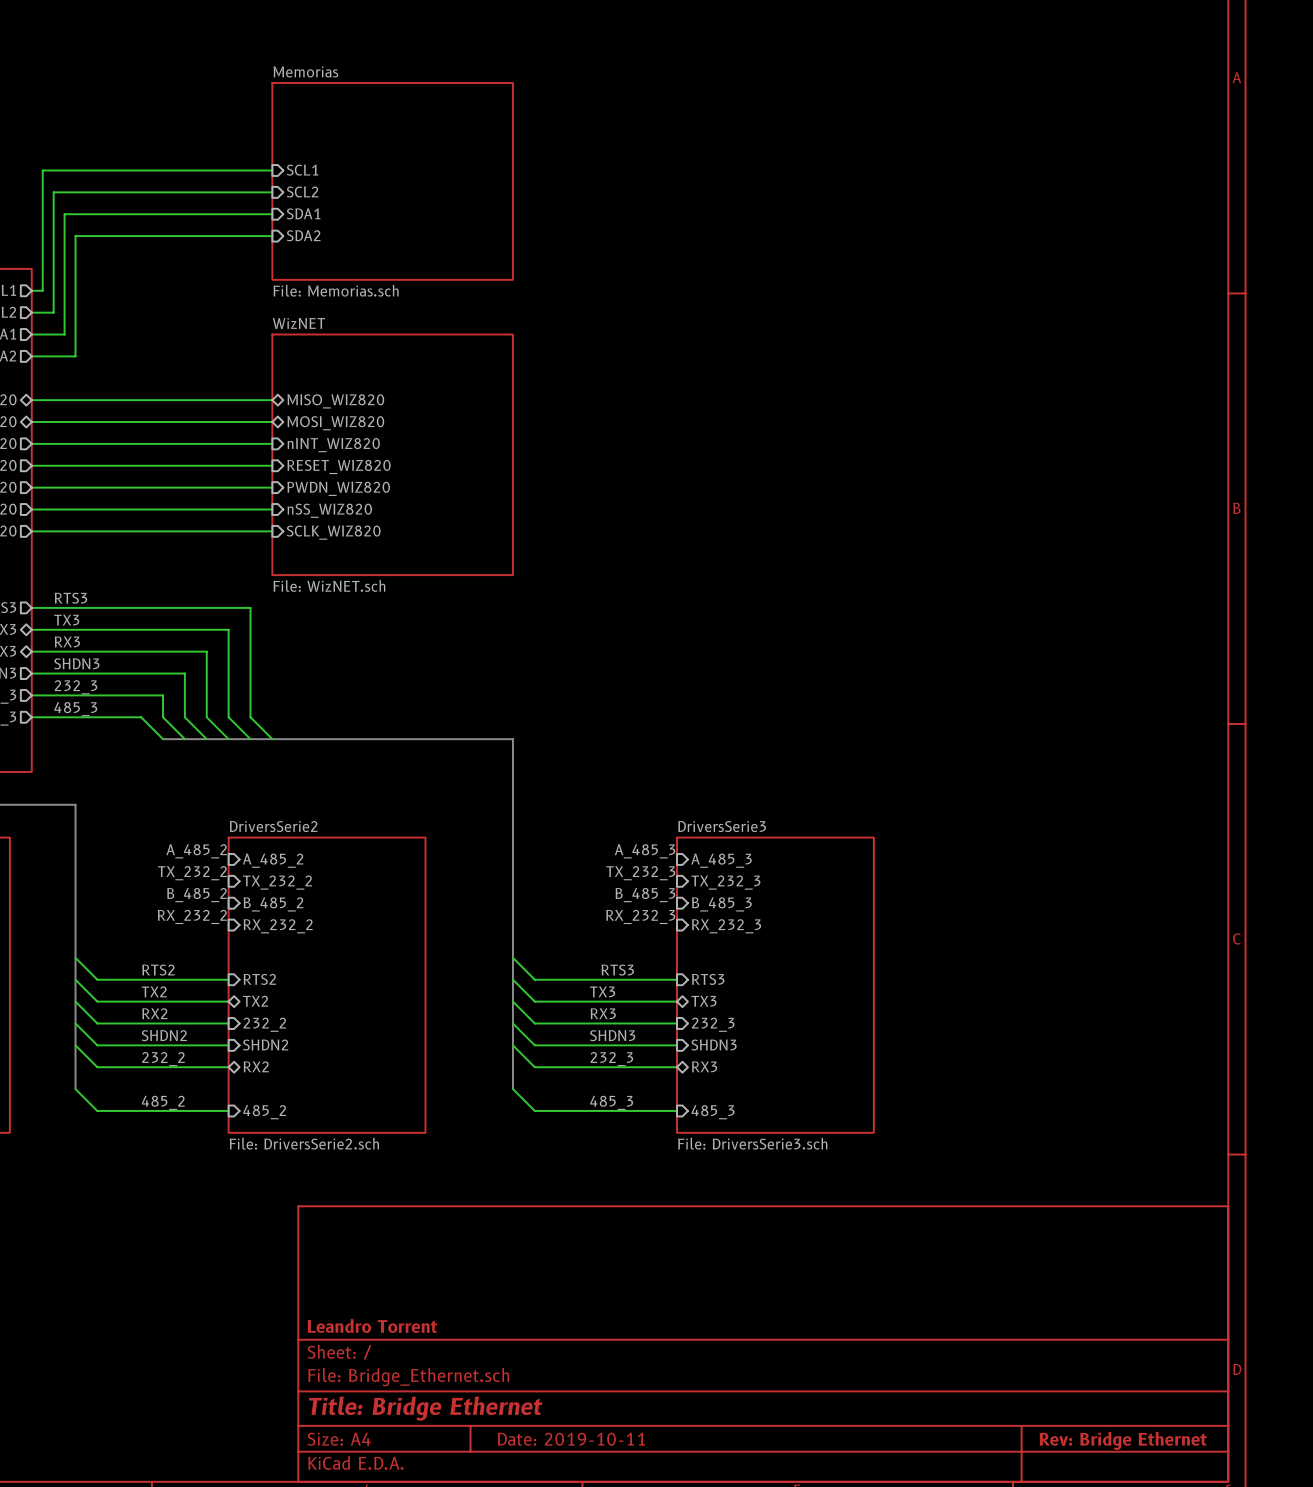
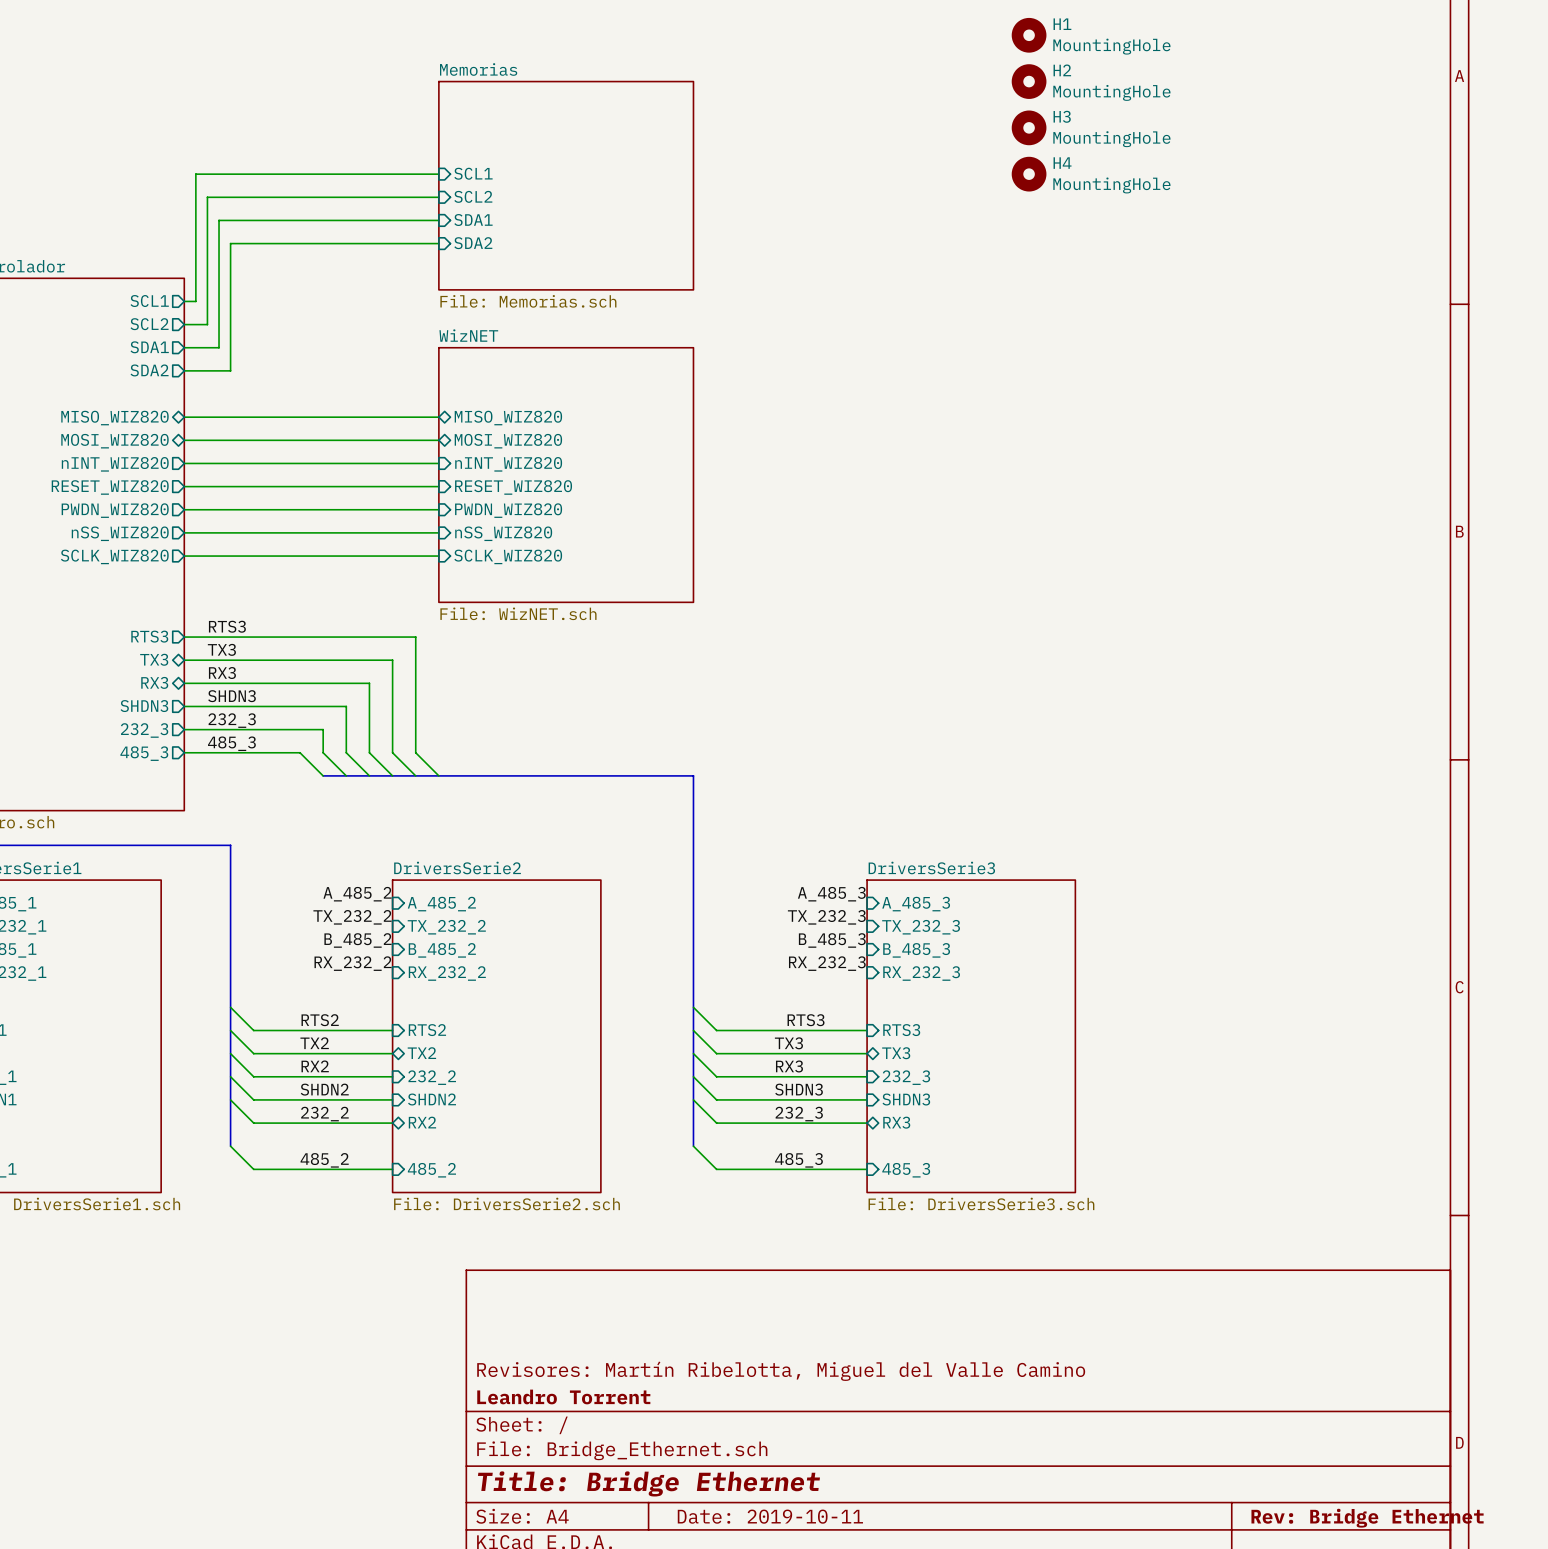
H1: none -> MountingHole (1029, 35)
H2: none -> MountingHole (1029, 81)
H3: none -> MountingHole (1029, 127)
H4: none -> MountingHole (1029, 174)
title block: none -> Revisores: Martín Ribelotta, Miguel del Valle Camino (781, 1371)

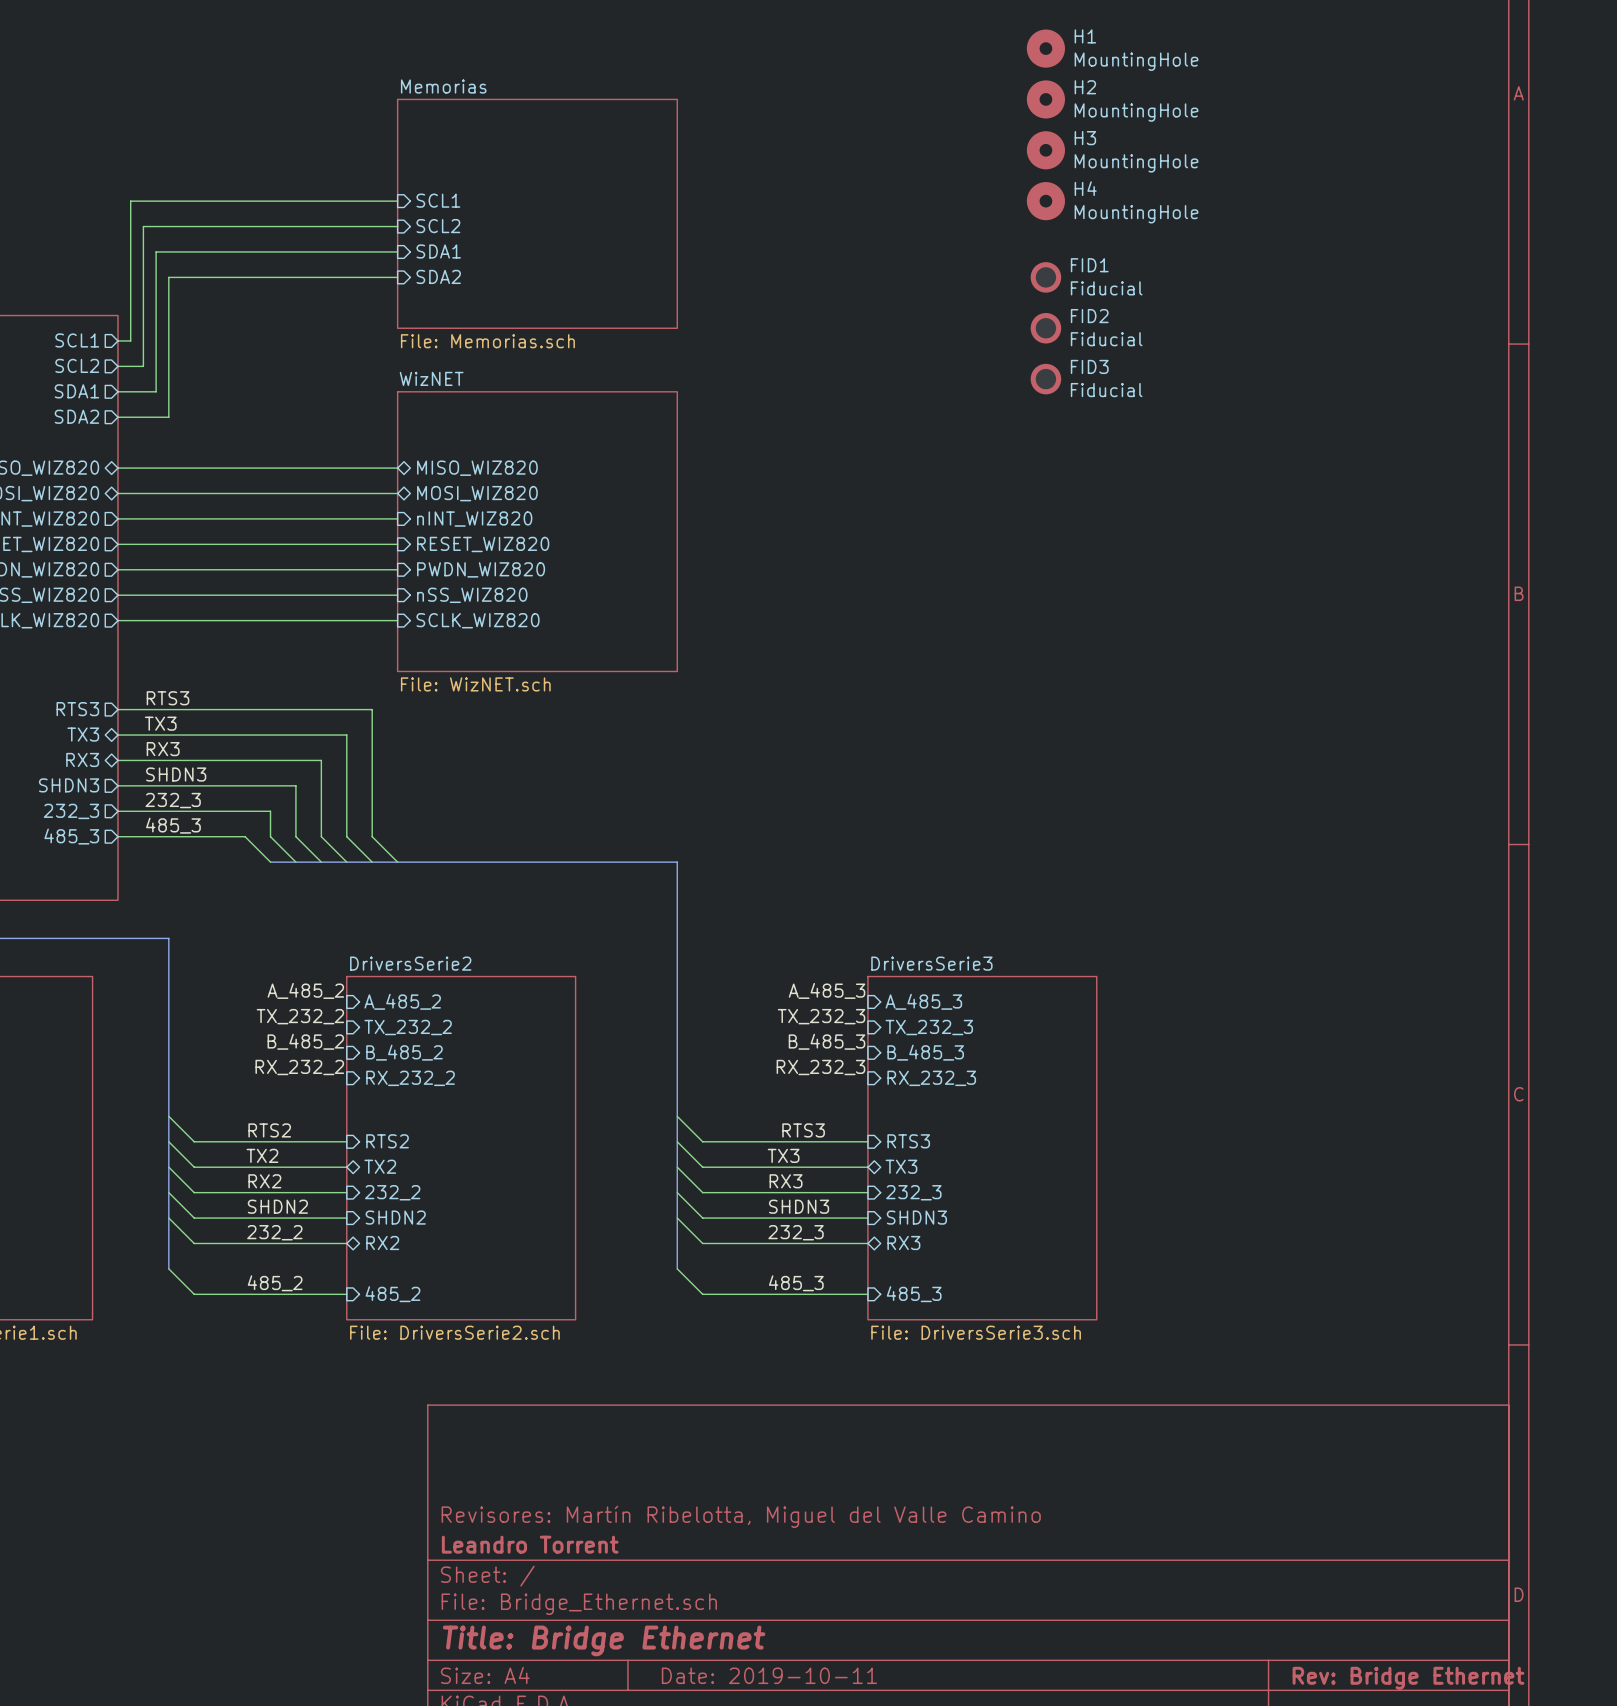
FID1: none -> Fiducial (1045, 277)
FID2: none -> Fiducial (1045, 328)
FID3: none -> Fiducial (1045, 379)

